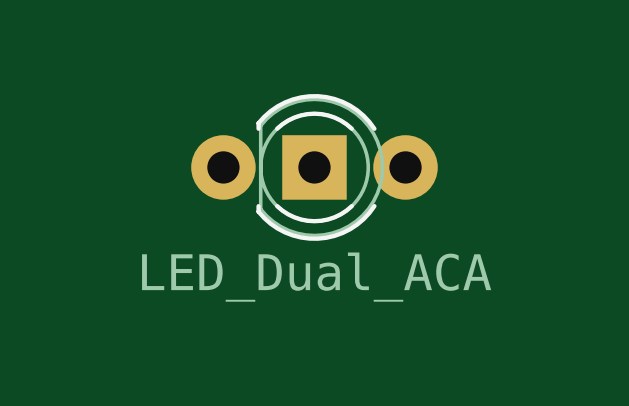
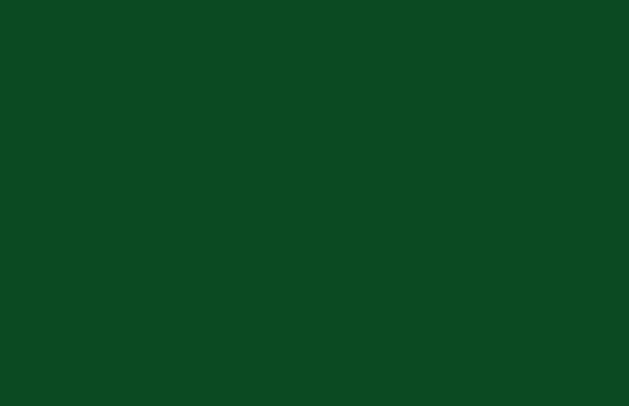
part: LED_Dual_ACA (314, 167) -> none

